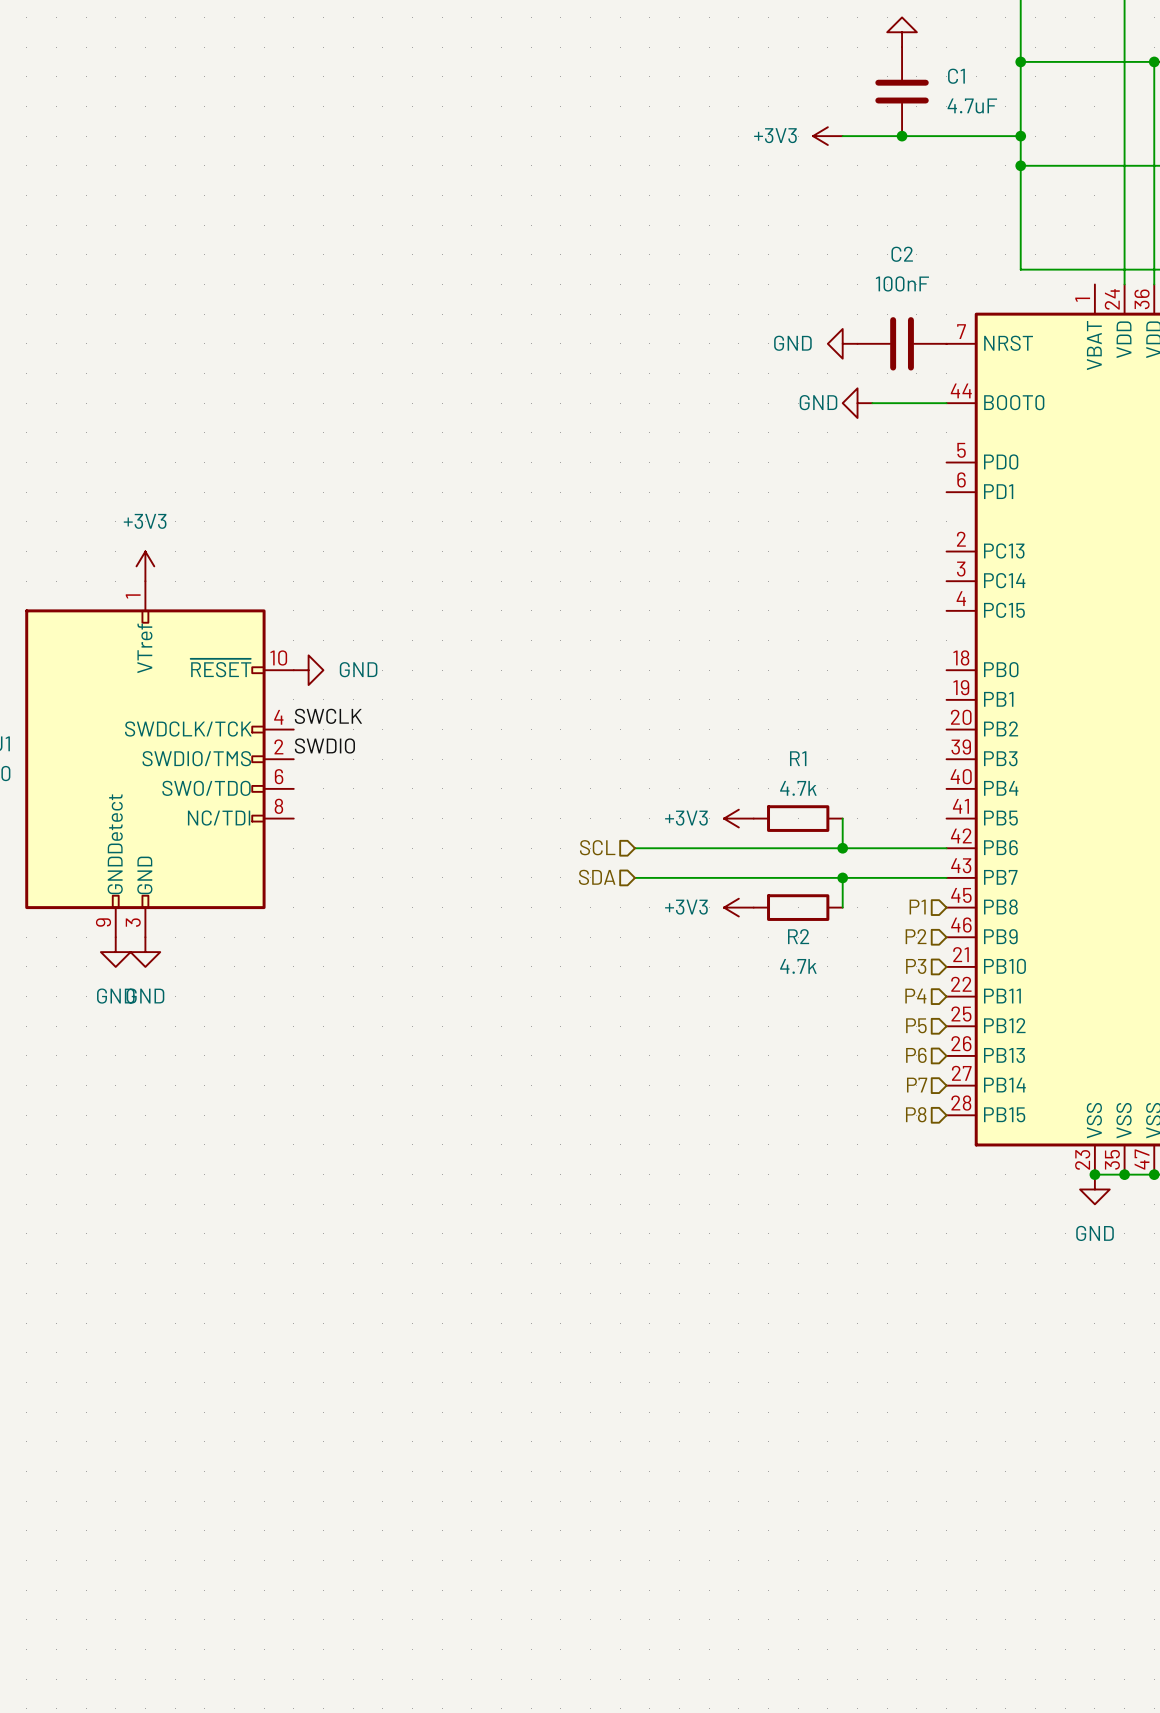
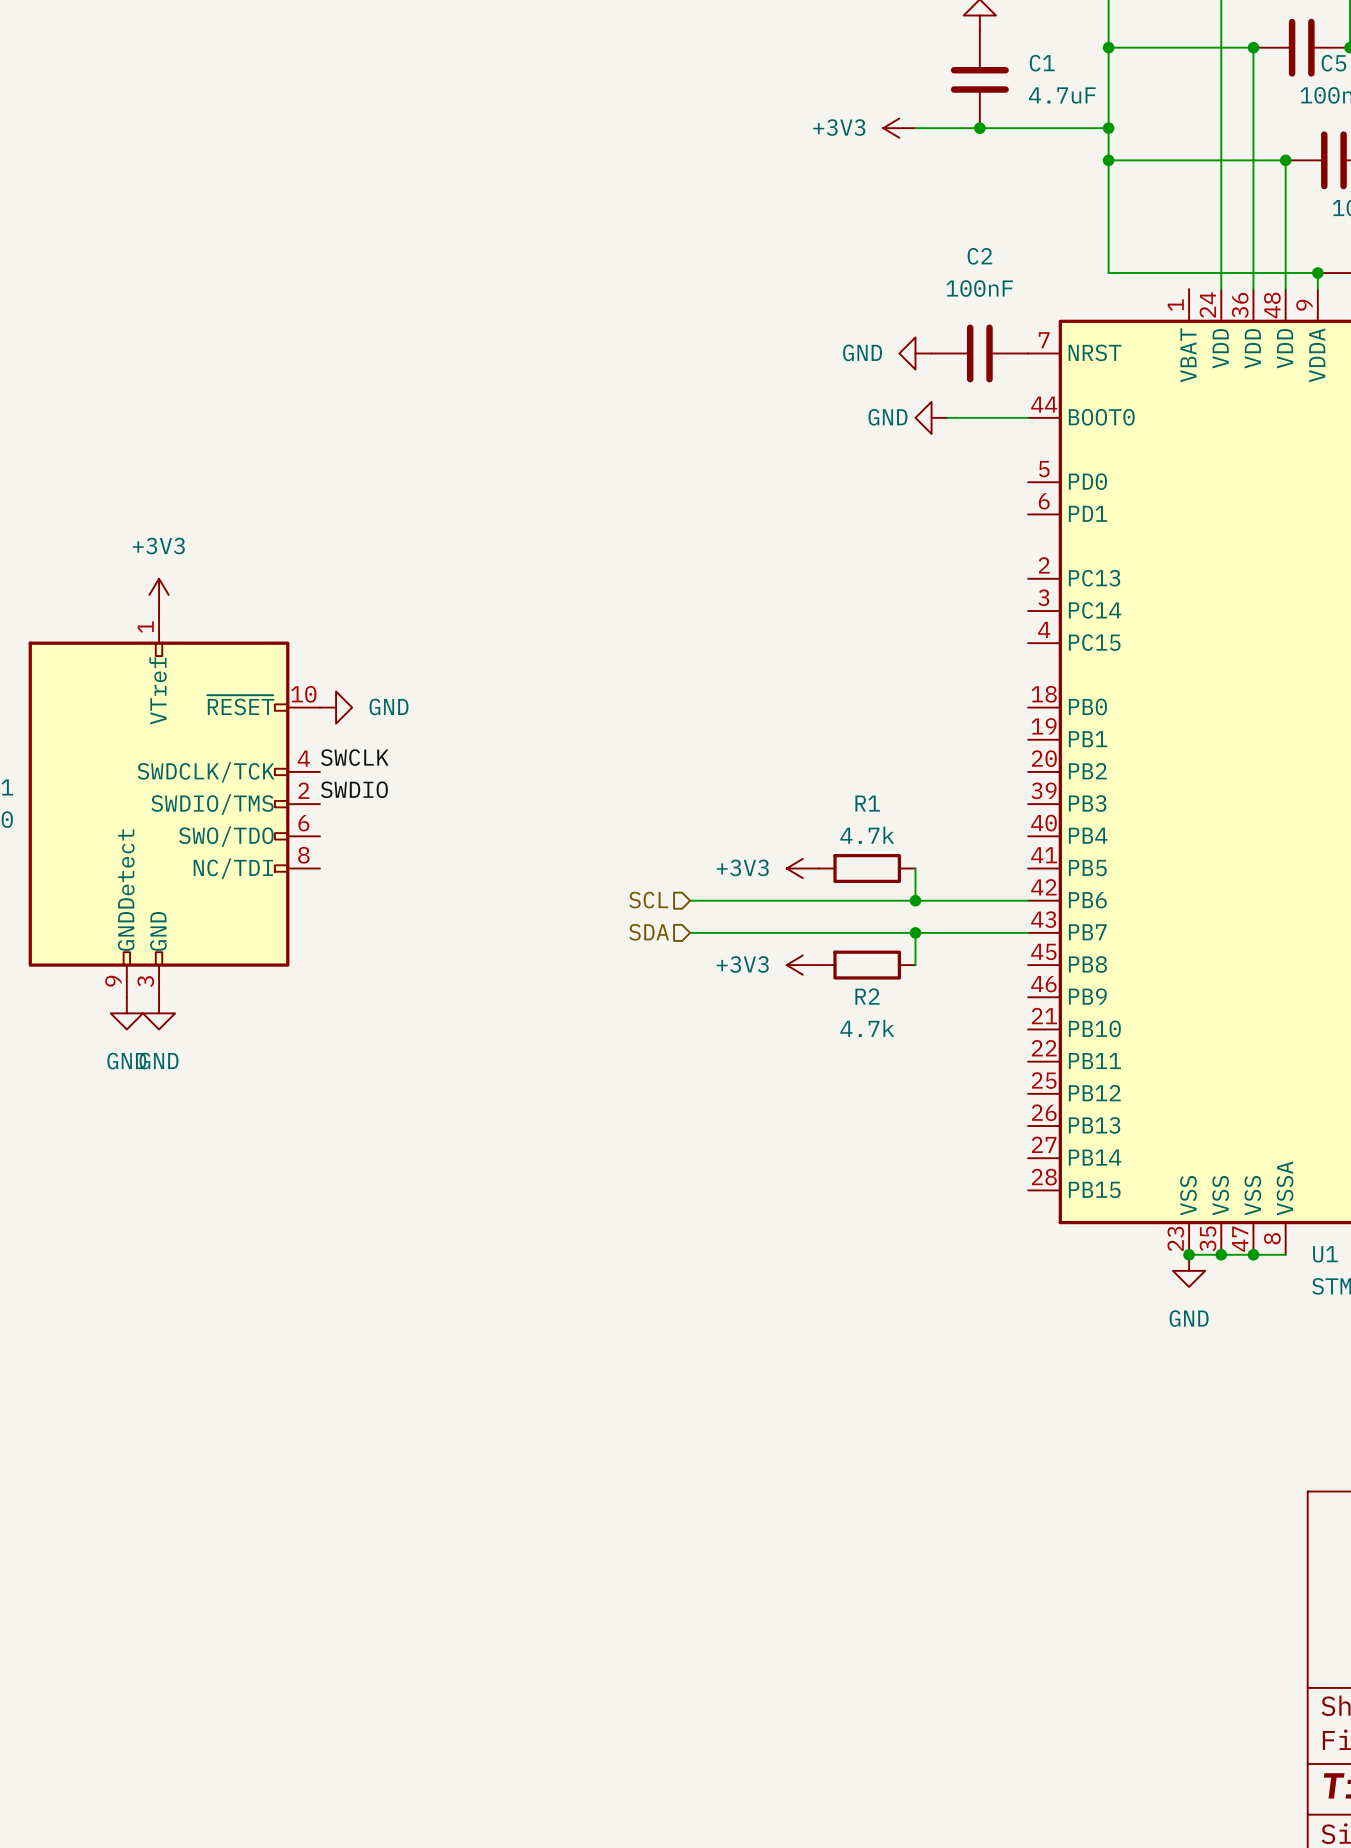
hierarchical label: P1 (917, 907) -> none
hierarchical label: P2 (916, 936) -> none
hierarchical label: P3 (916, 966) -> none
hierarchical label: P4 (915, 996) -> none
hierarchical label: P5 (916, 1025) -> none
hierarchical label: P6 (916, 1055) -> none
hierarchical label: P7 (917, 1085) -> none
hierarchical label: P8 (916, 1114) -> none

